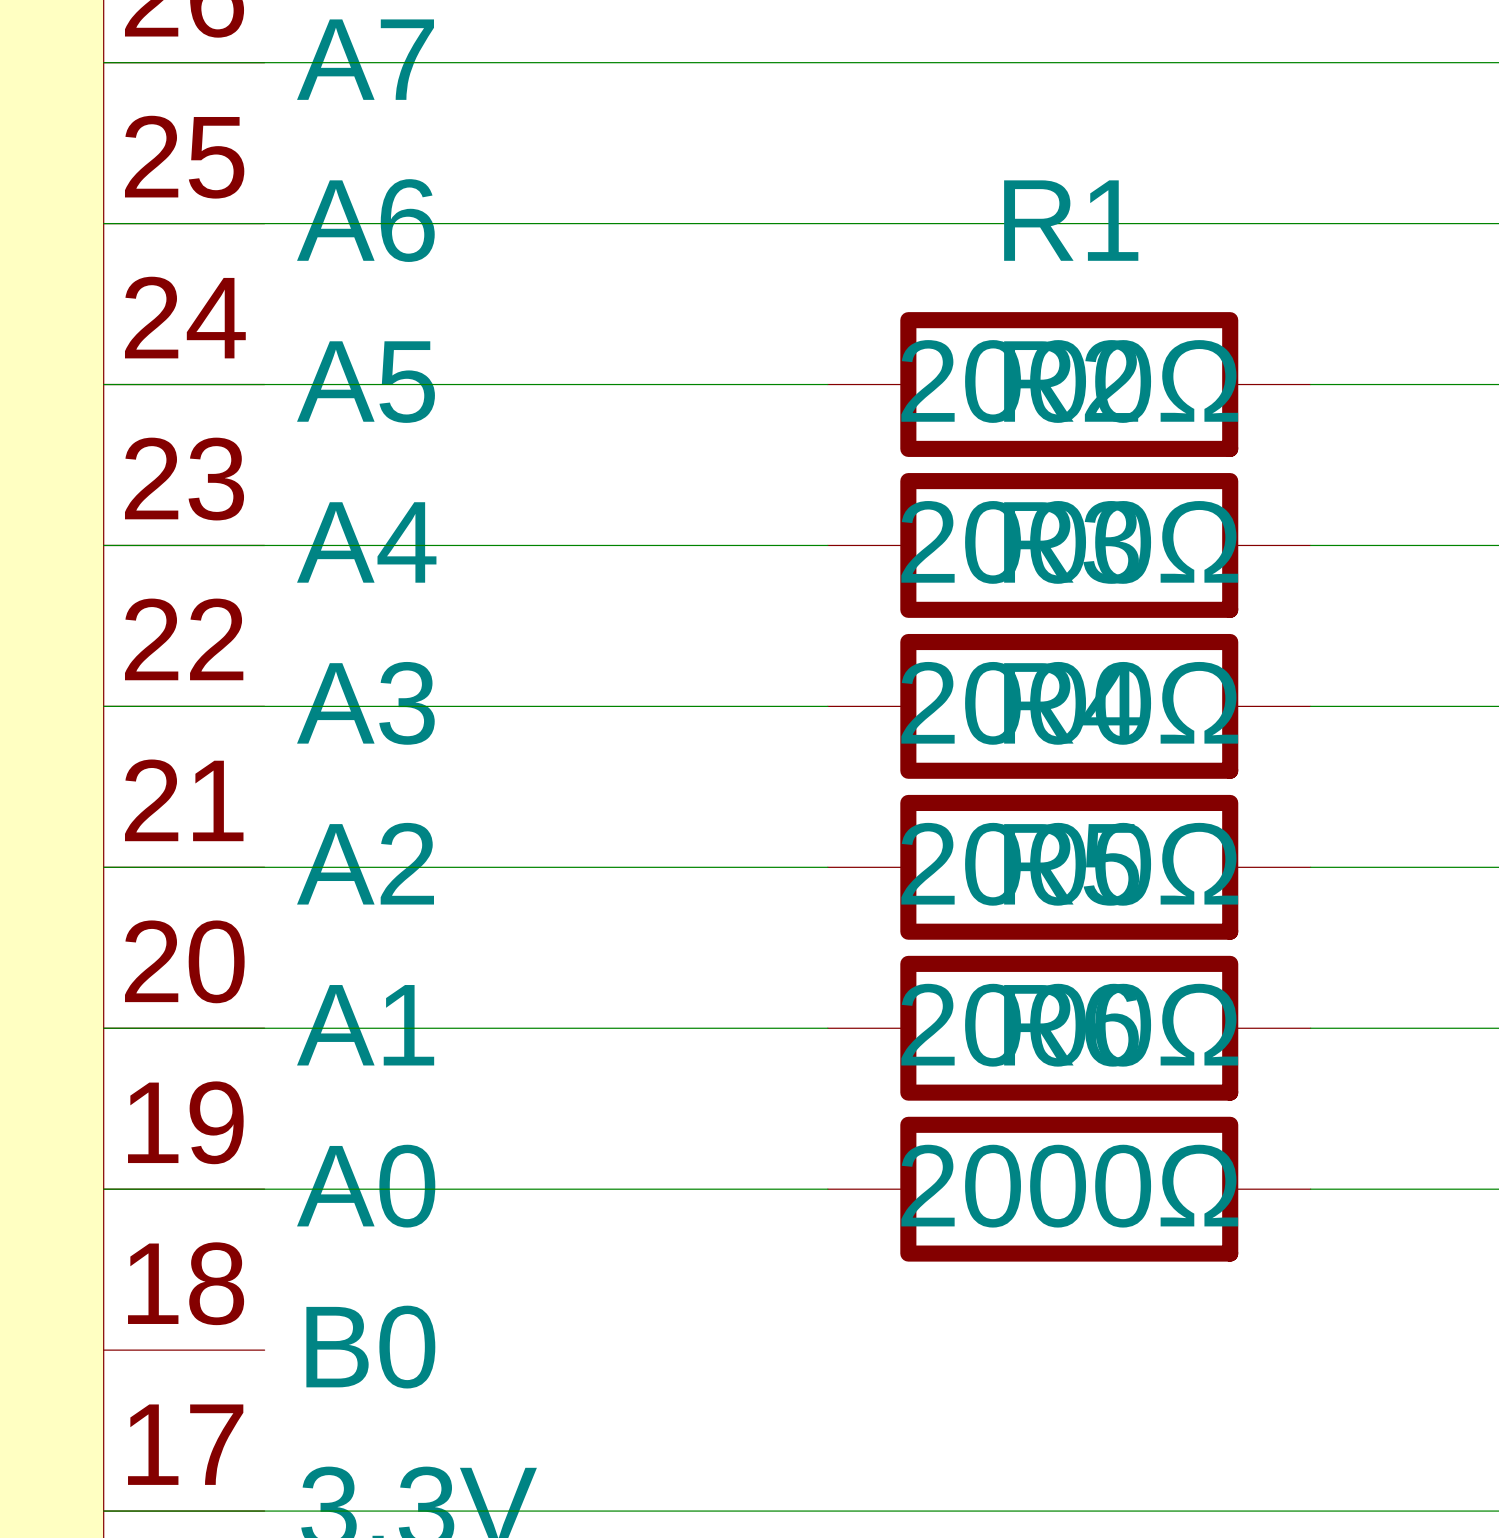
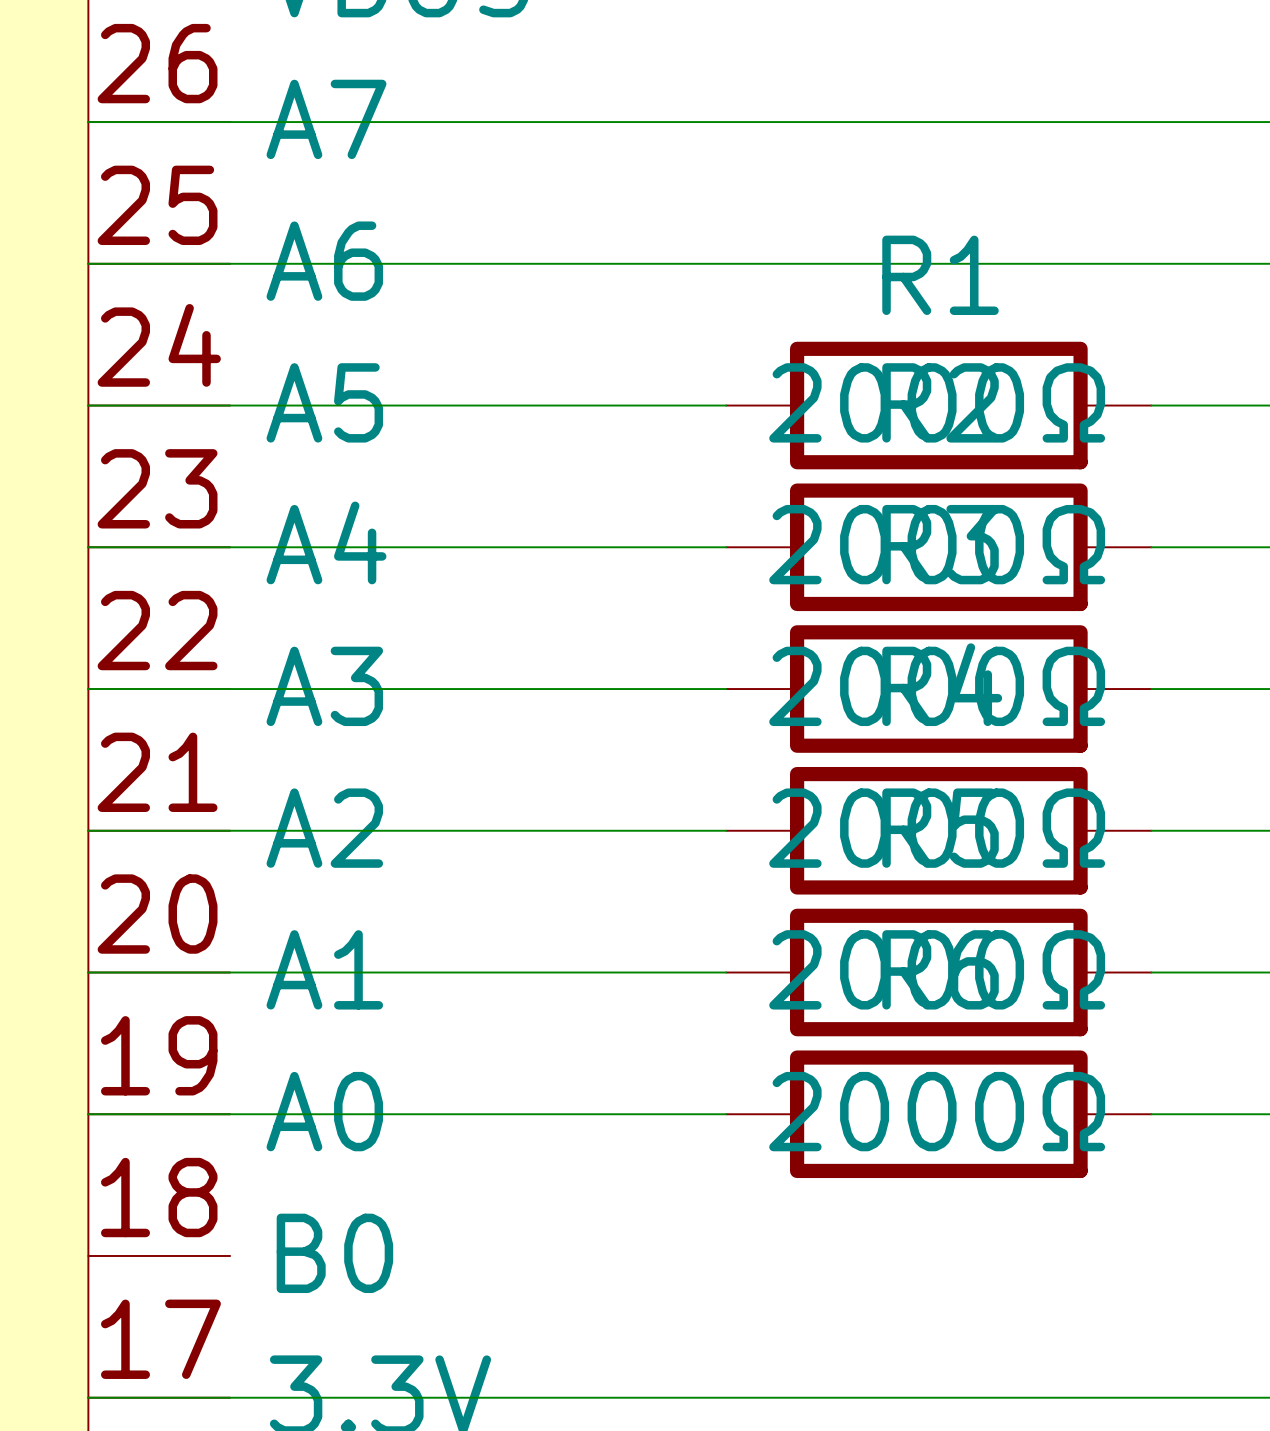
R1 name position: R1 (1071, 220) -> R1 (940, 275)

